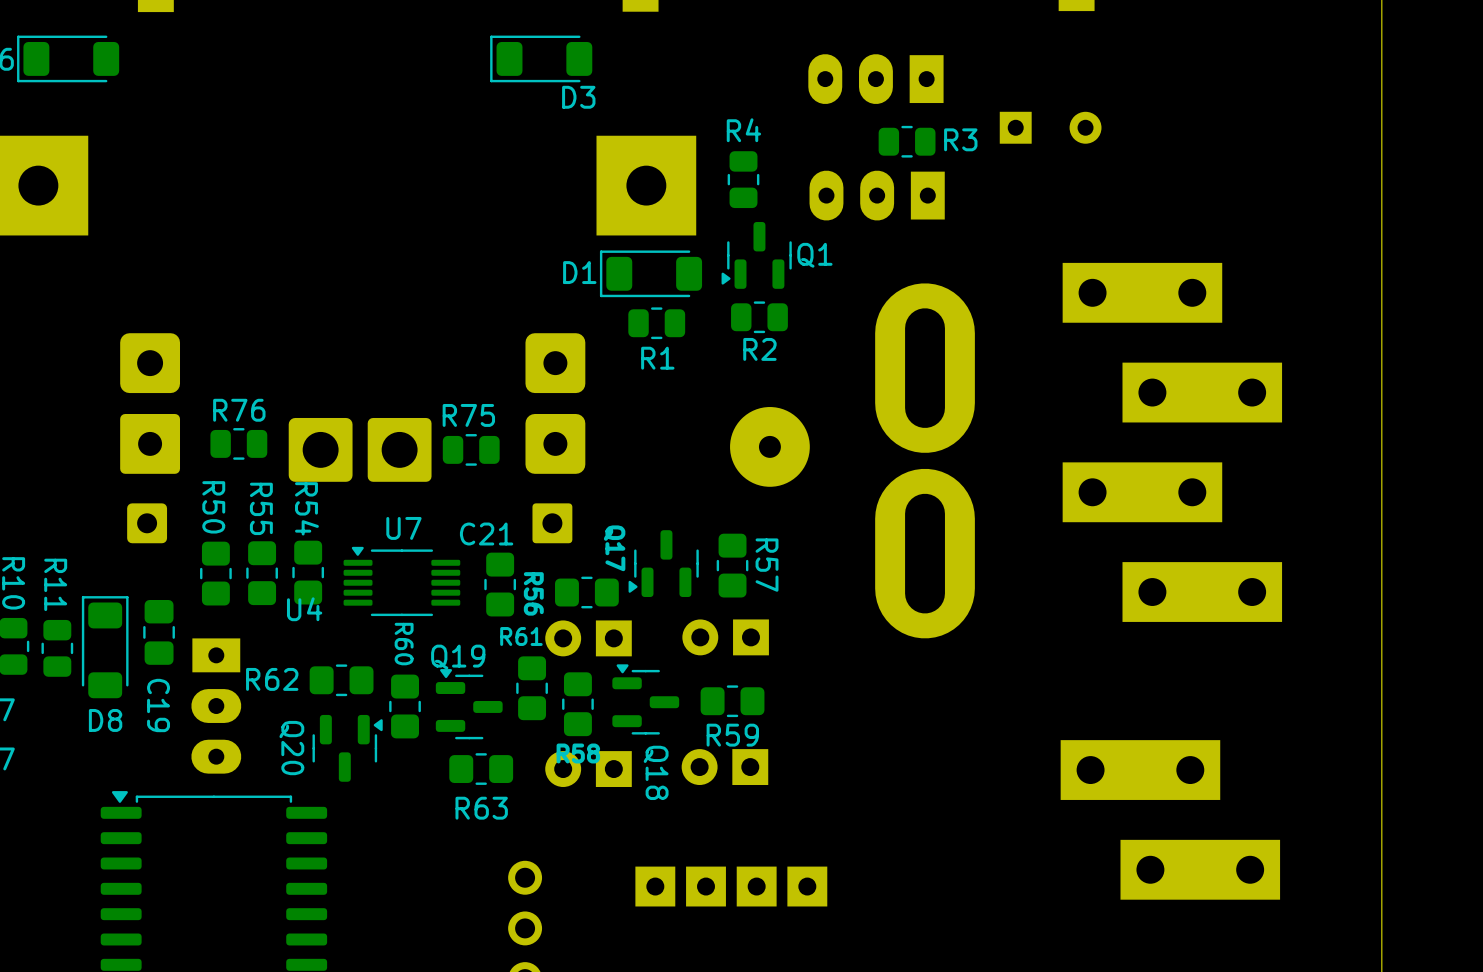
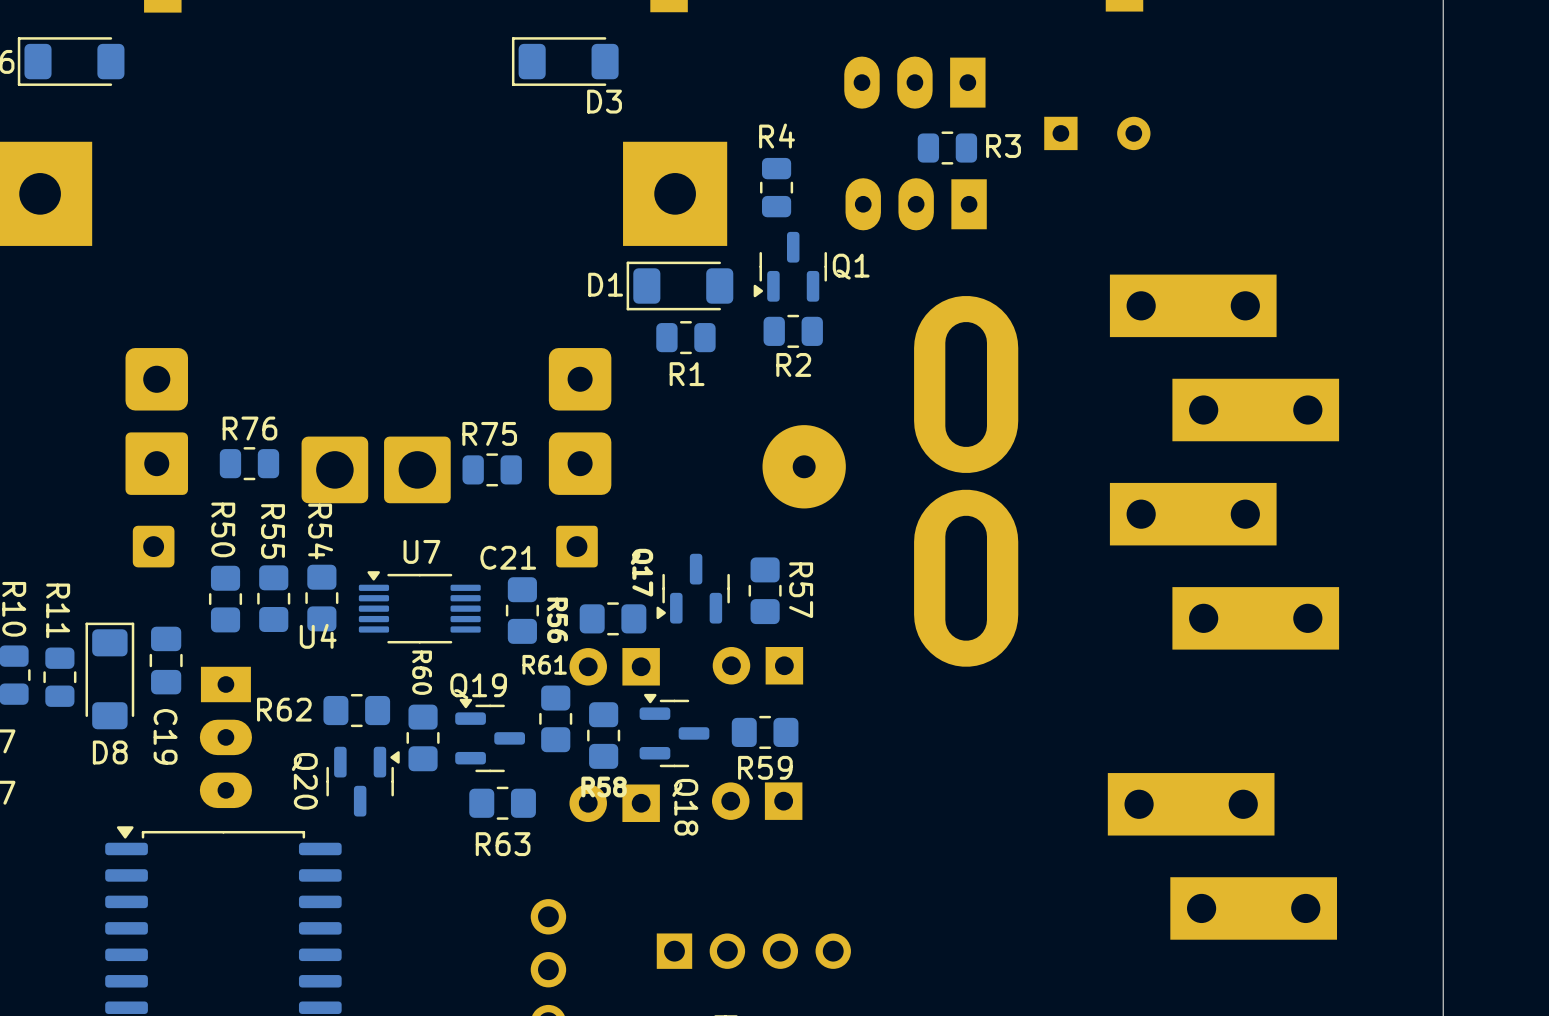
part: (731, 886) -> none
part: none -> (753, 951)

